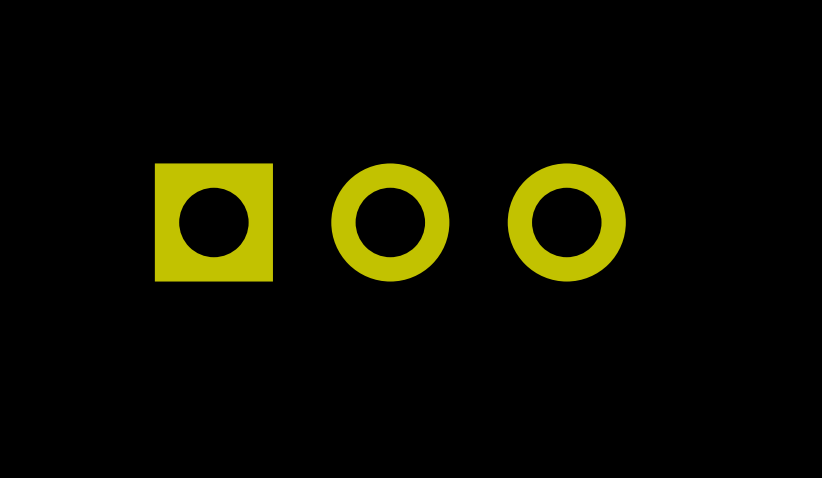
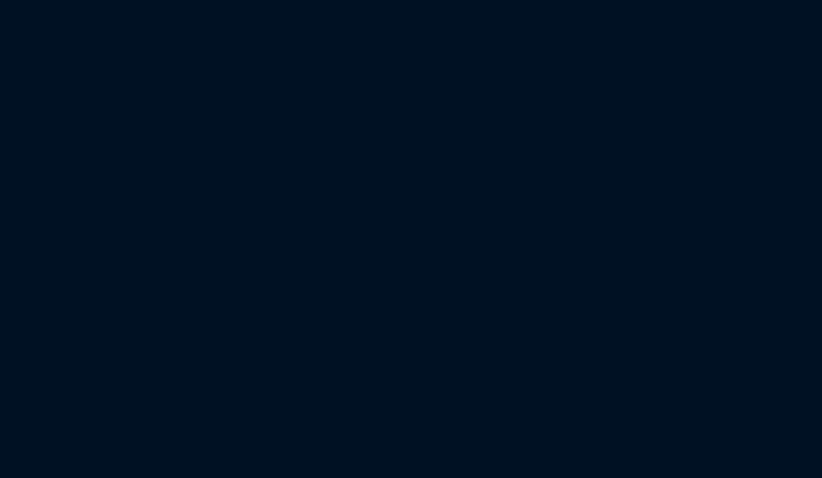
part: (390, 222) -> none

